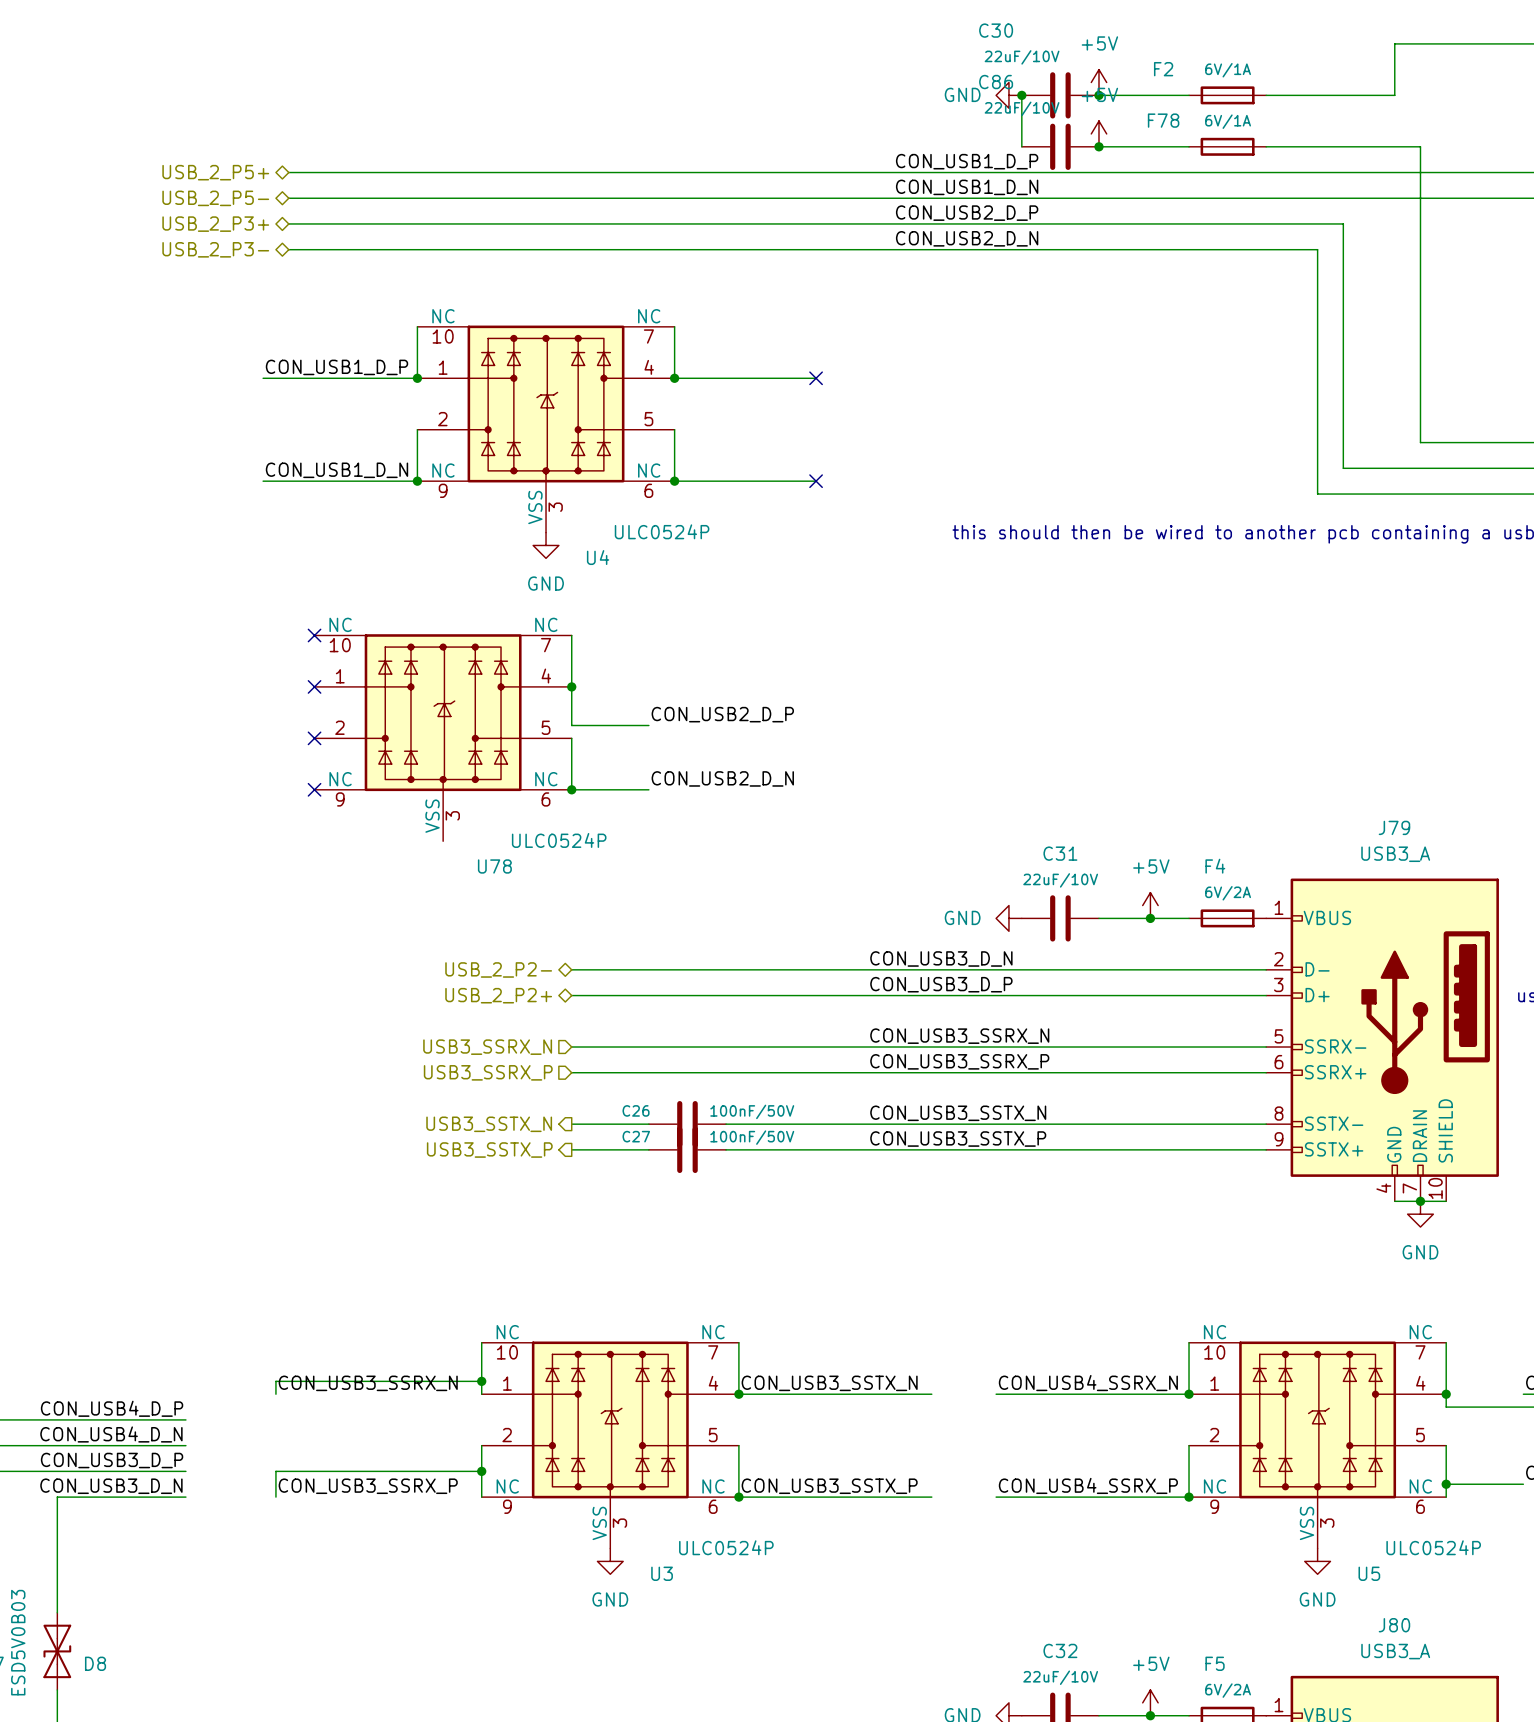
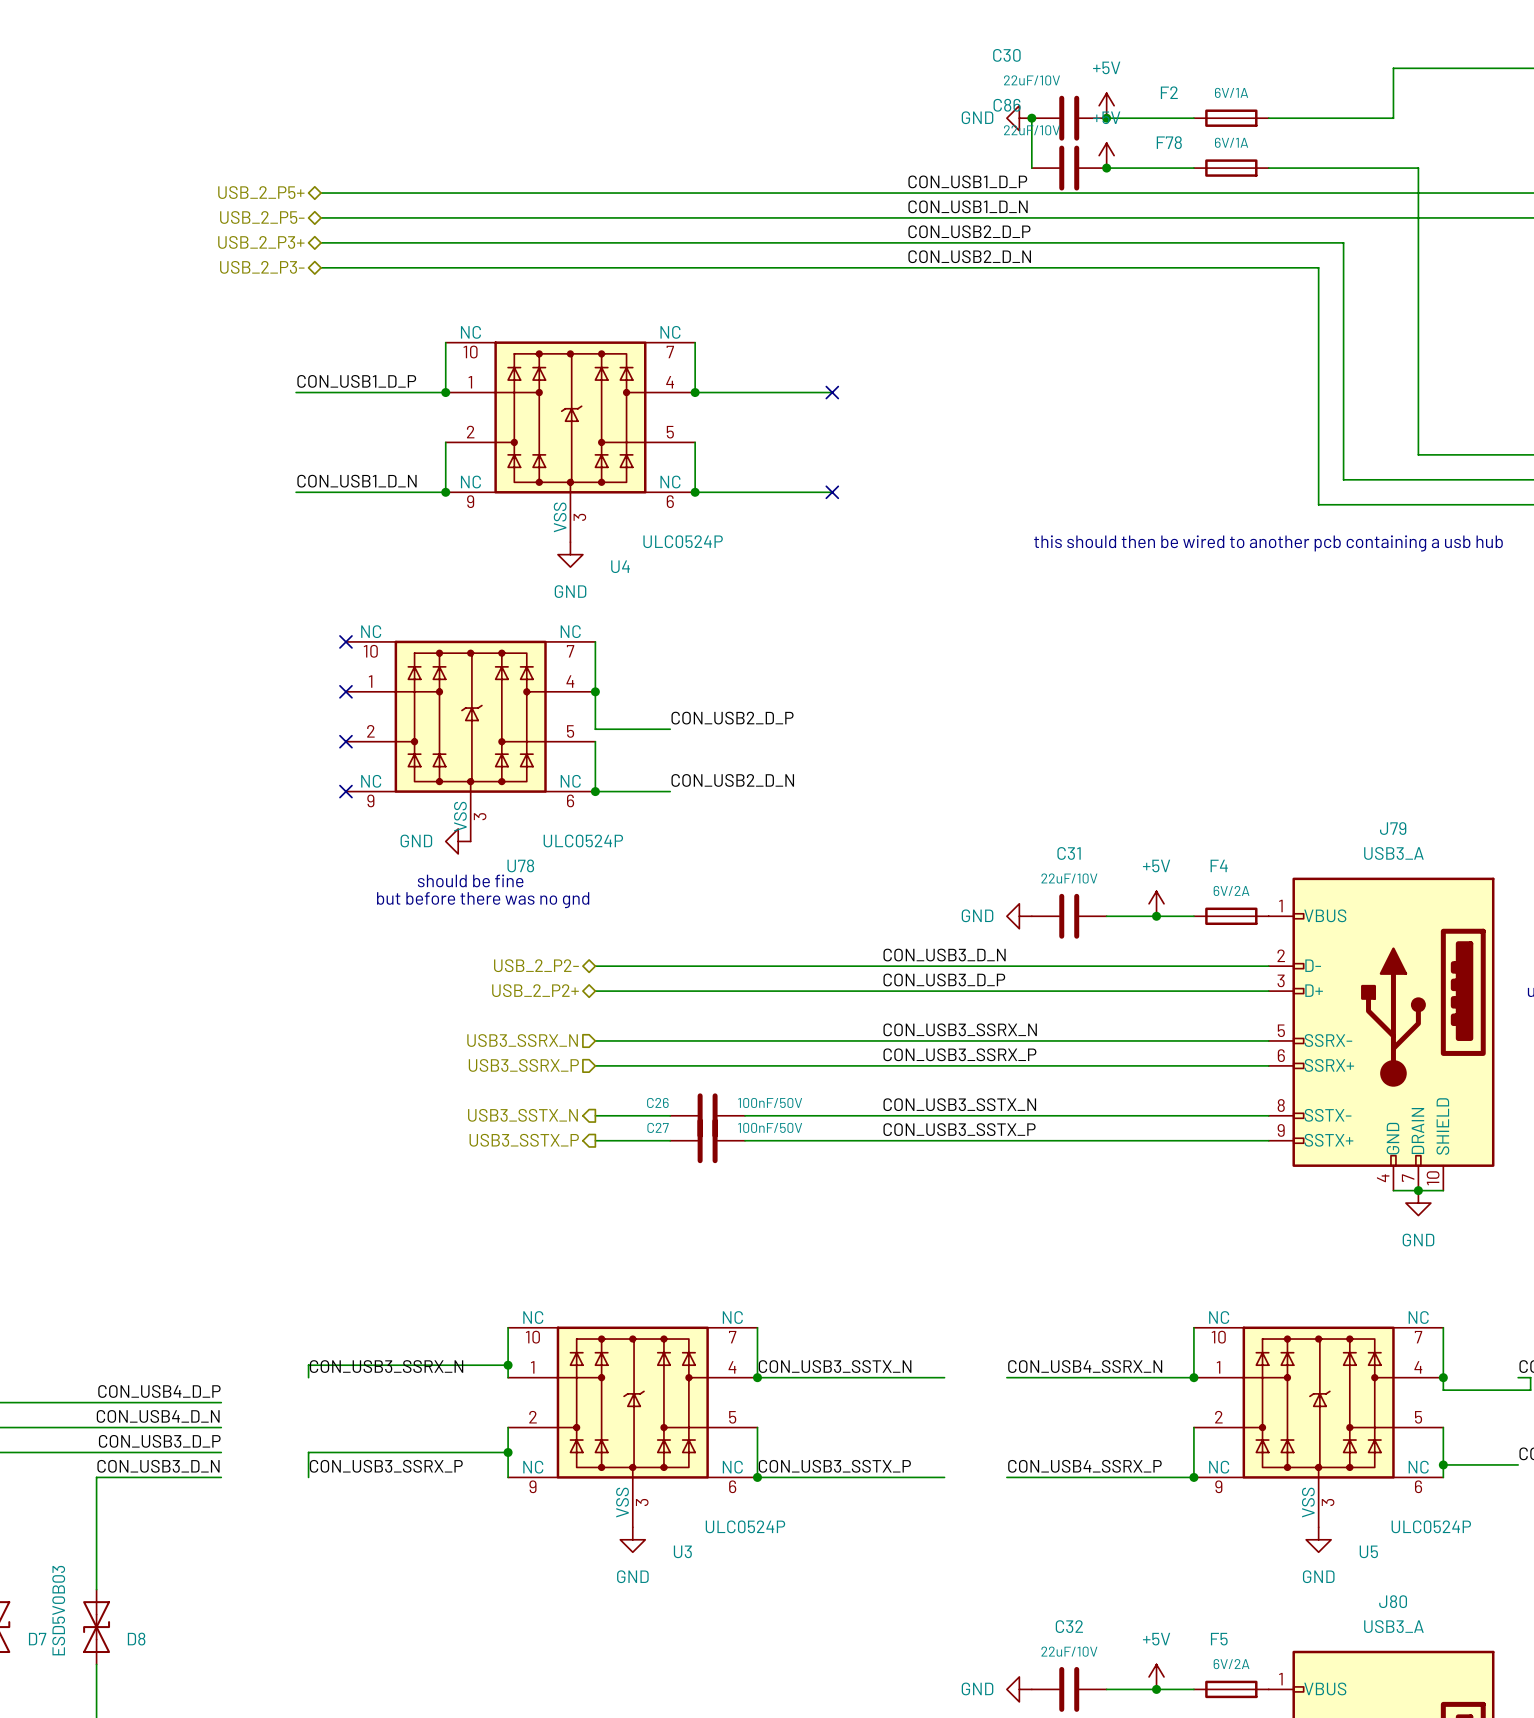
power symbol: none -> GND (458, 841)
text: none -> should be fine (470, 880)
text: none -> but before there was no gnd (483, 900)

